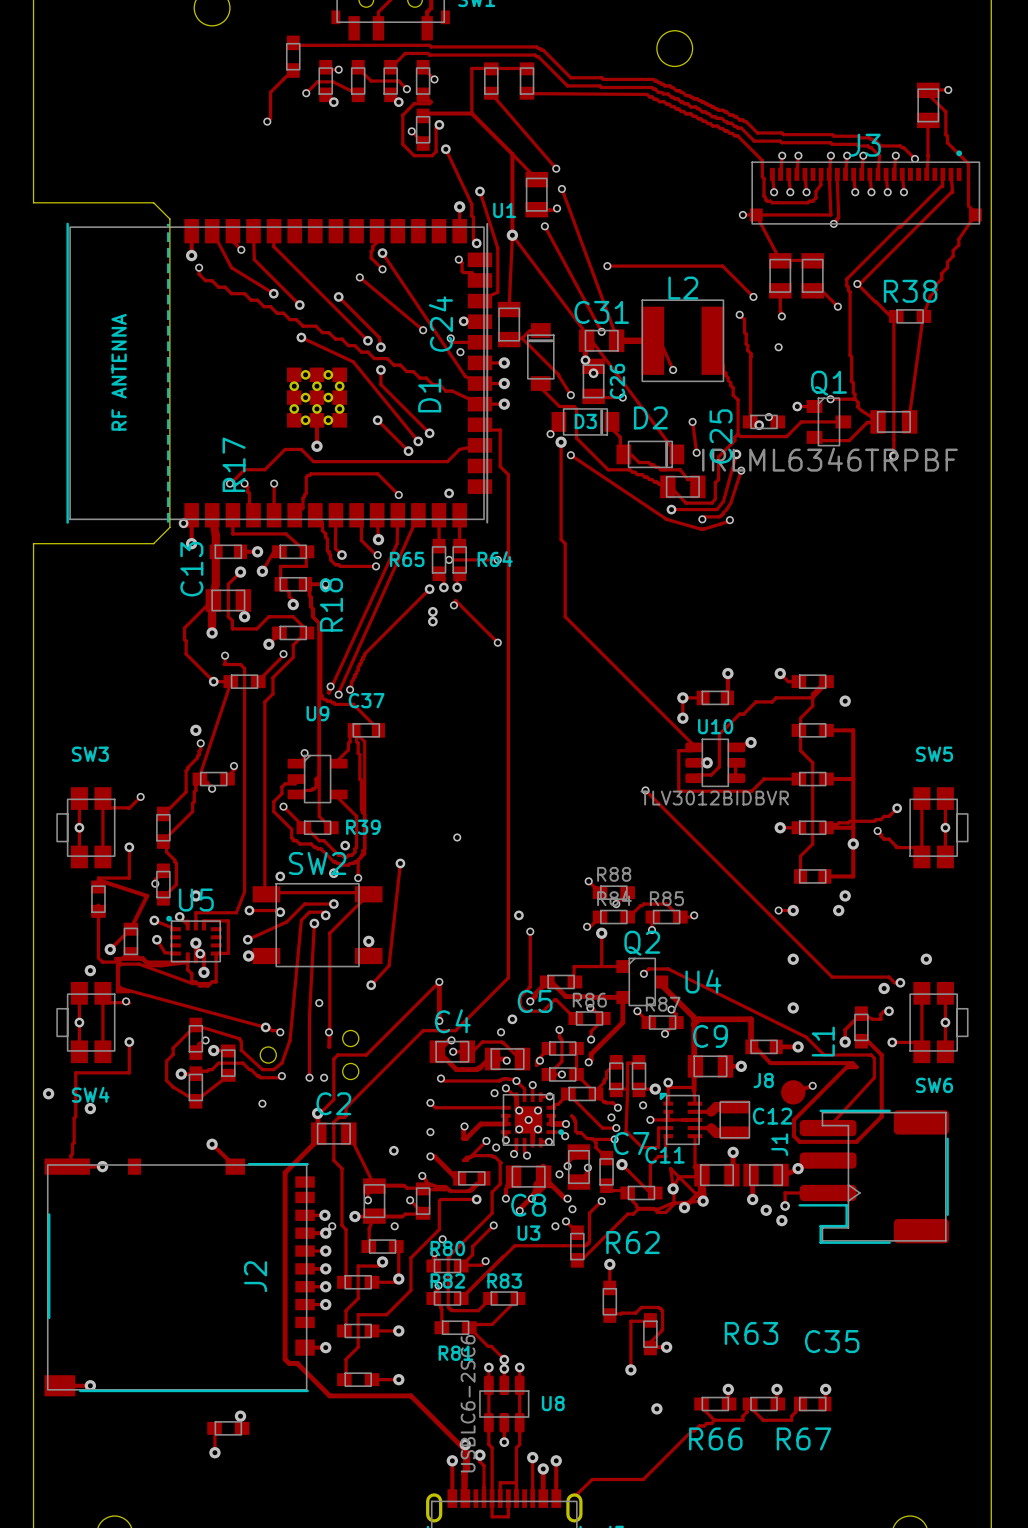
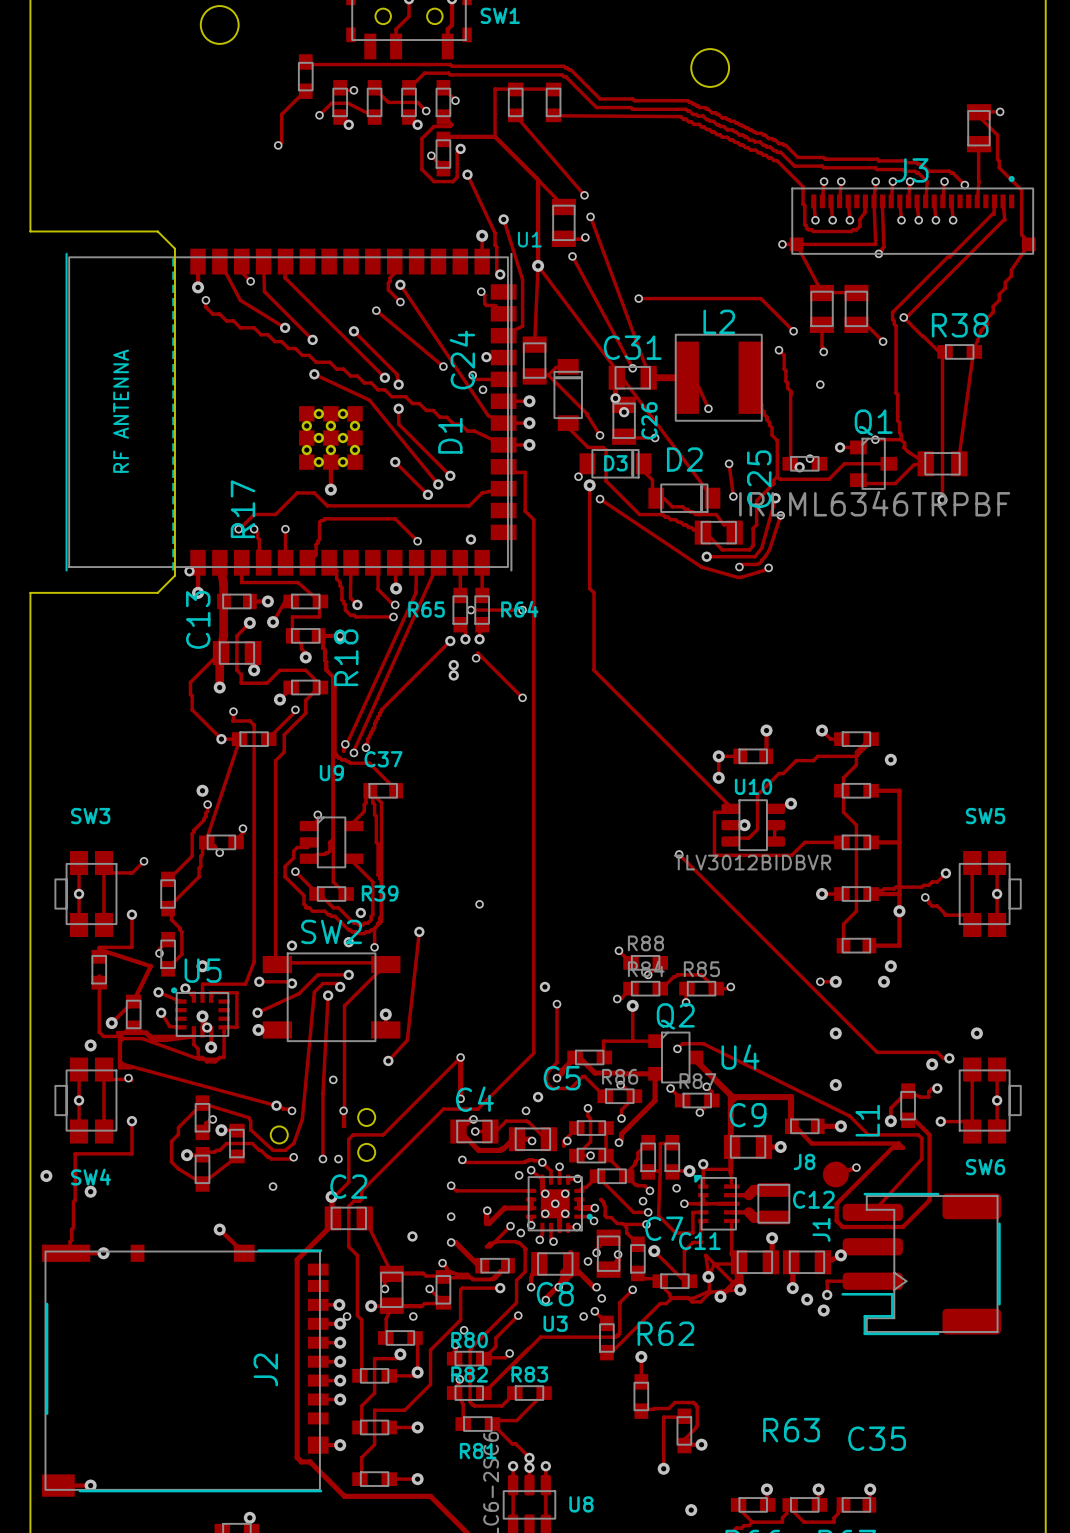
U1 footprint: [66, 219, 493, 528] -> [65, 248, 517, 576]

